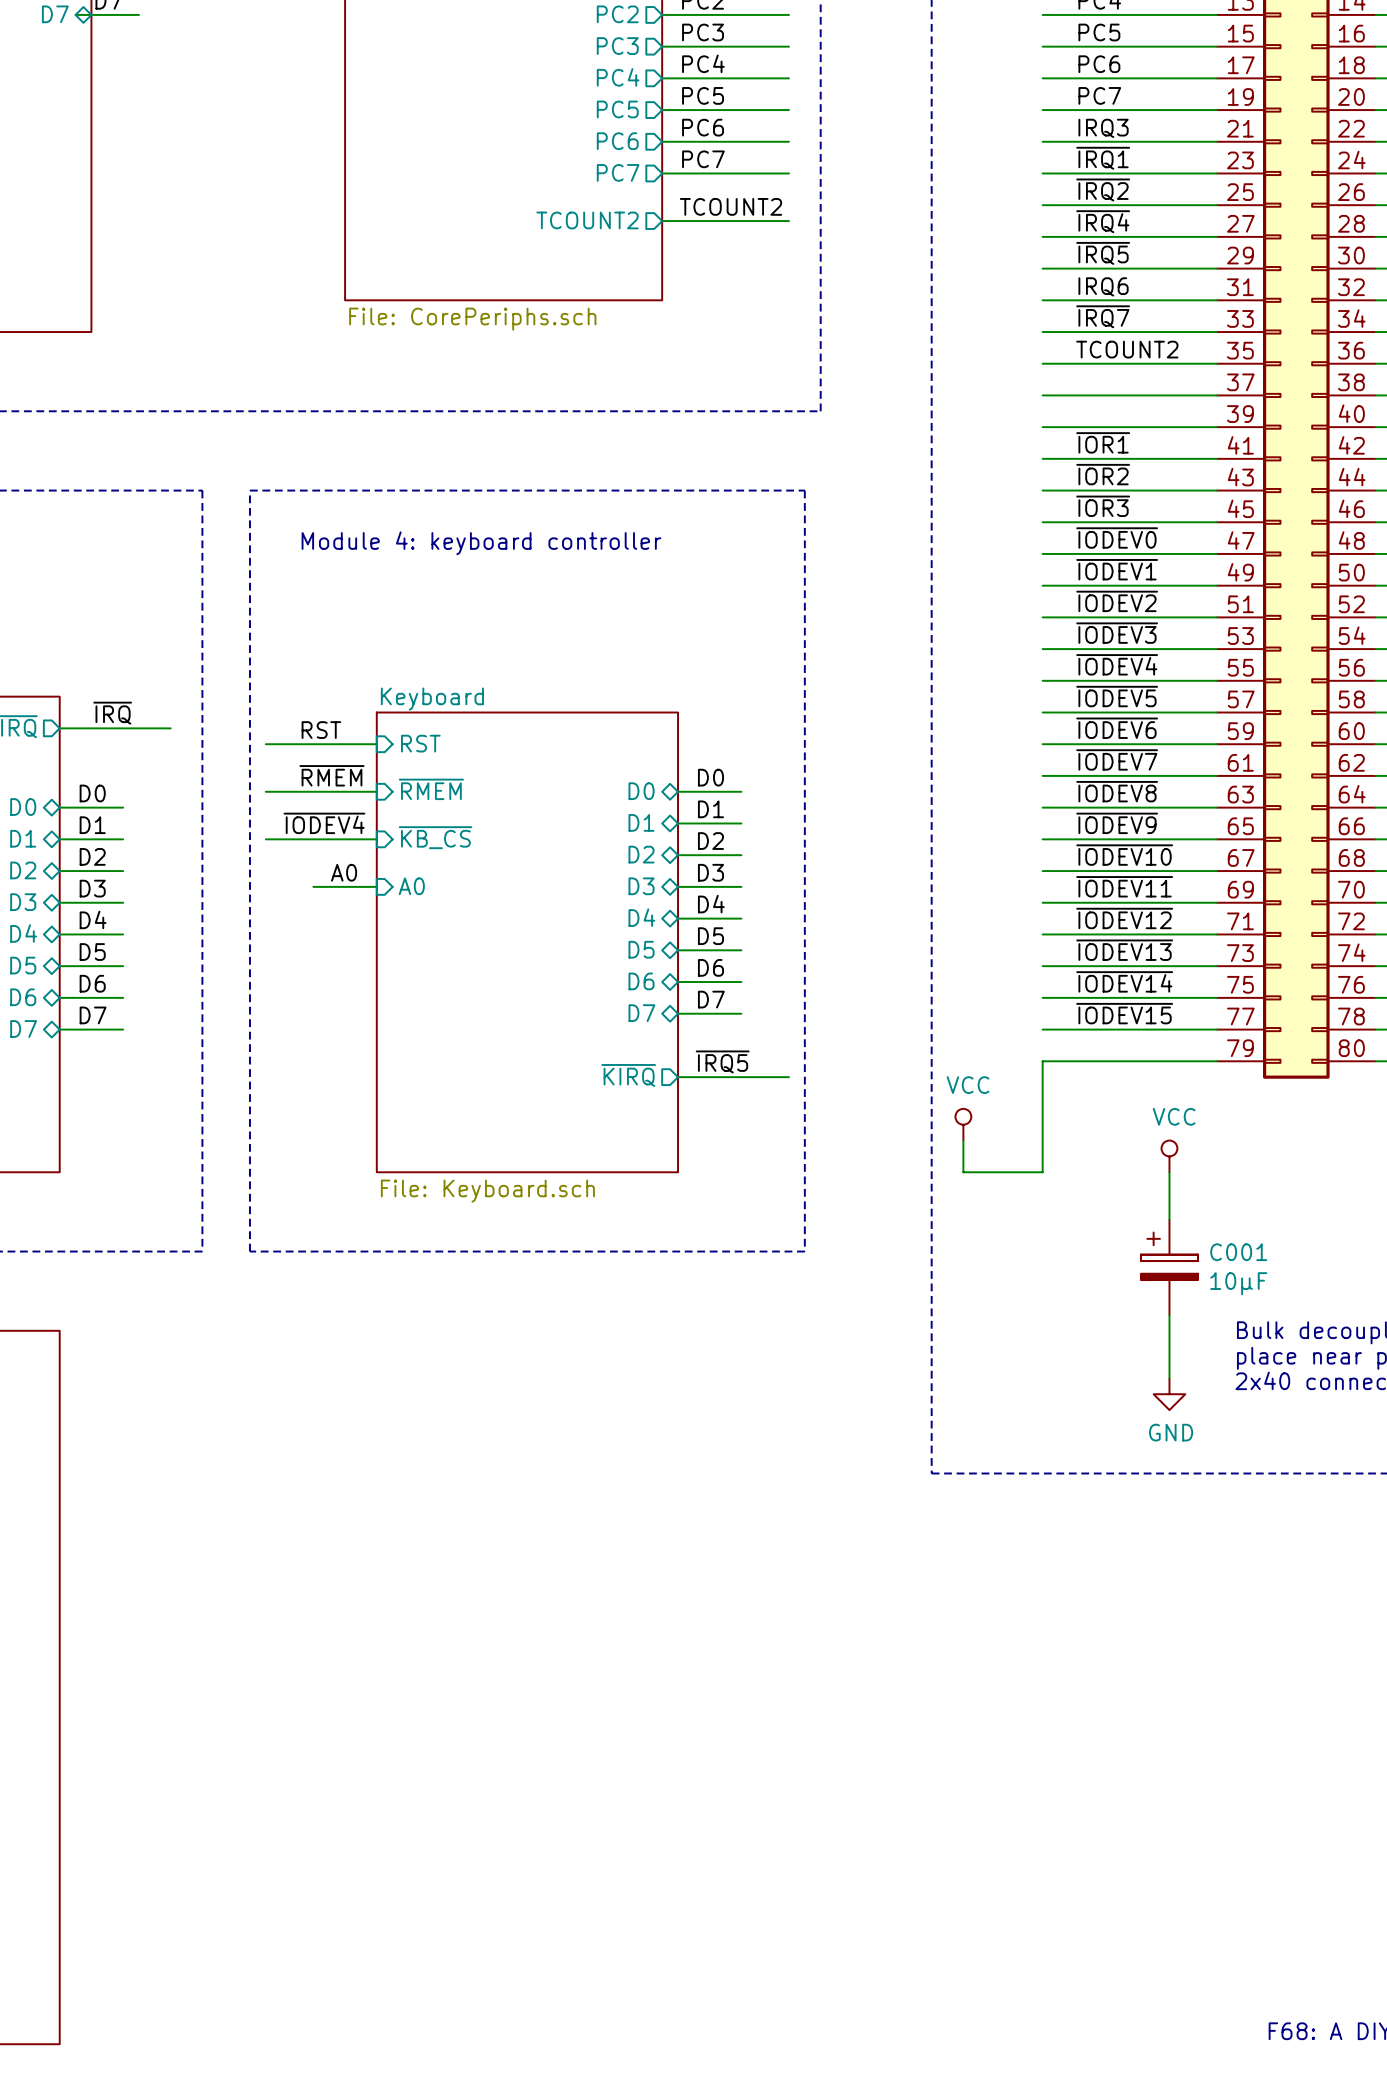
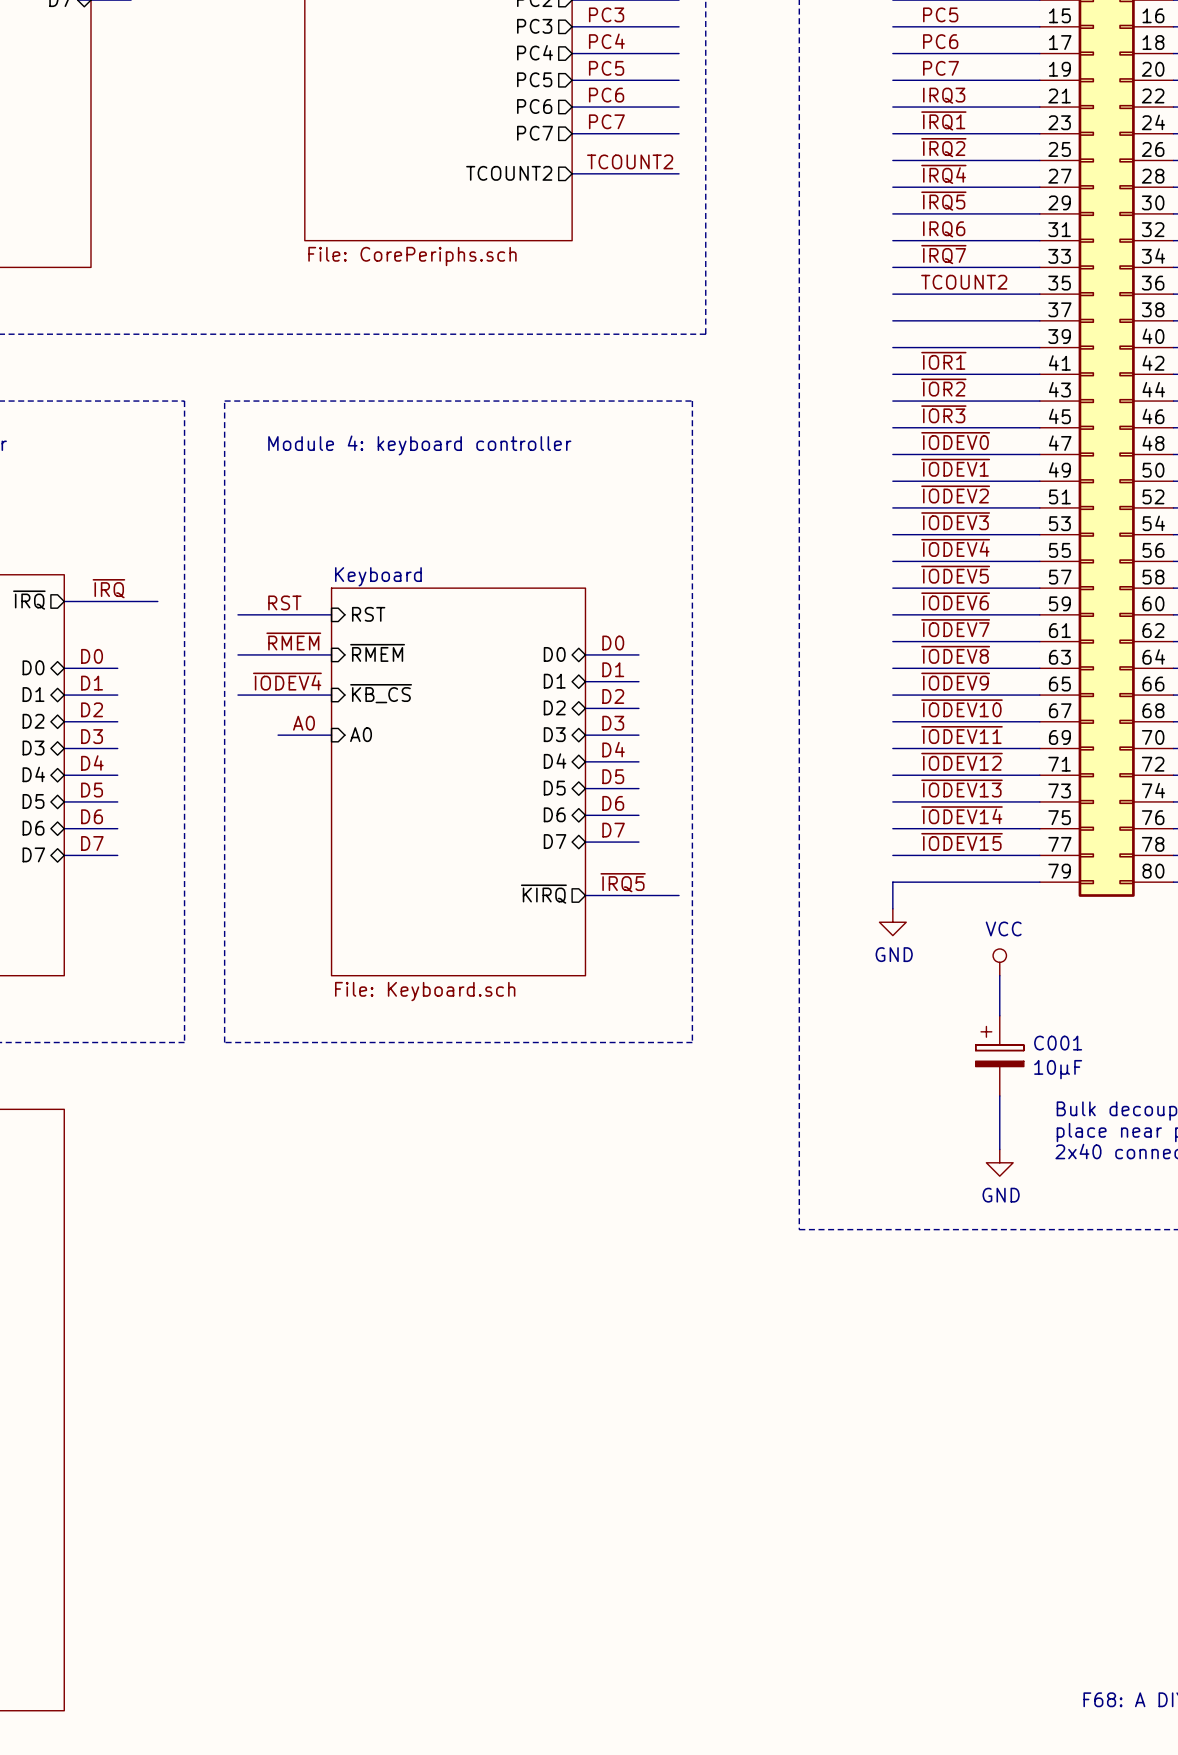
wire: (1042, 1093) (1042, 1172) (963, 1172) (963, 1140) -> none
power symbol: none -> GND (892, 922)
power symbol: VCC (963, 1124) -> none

